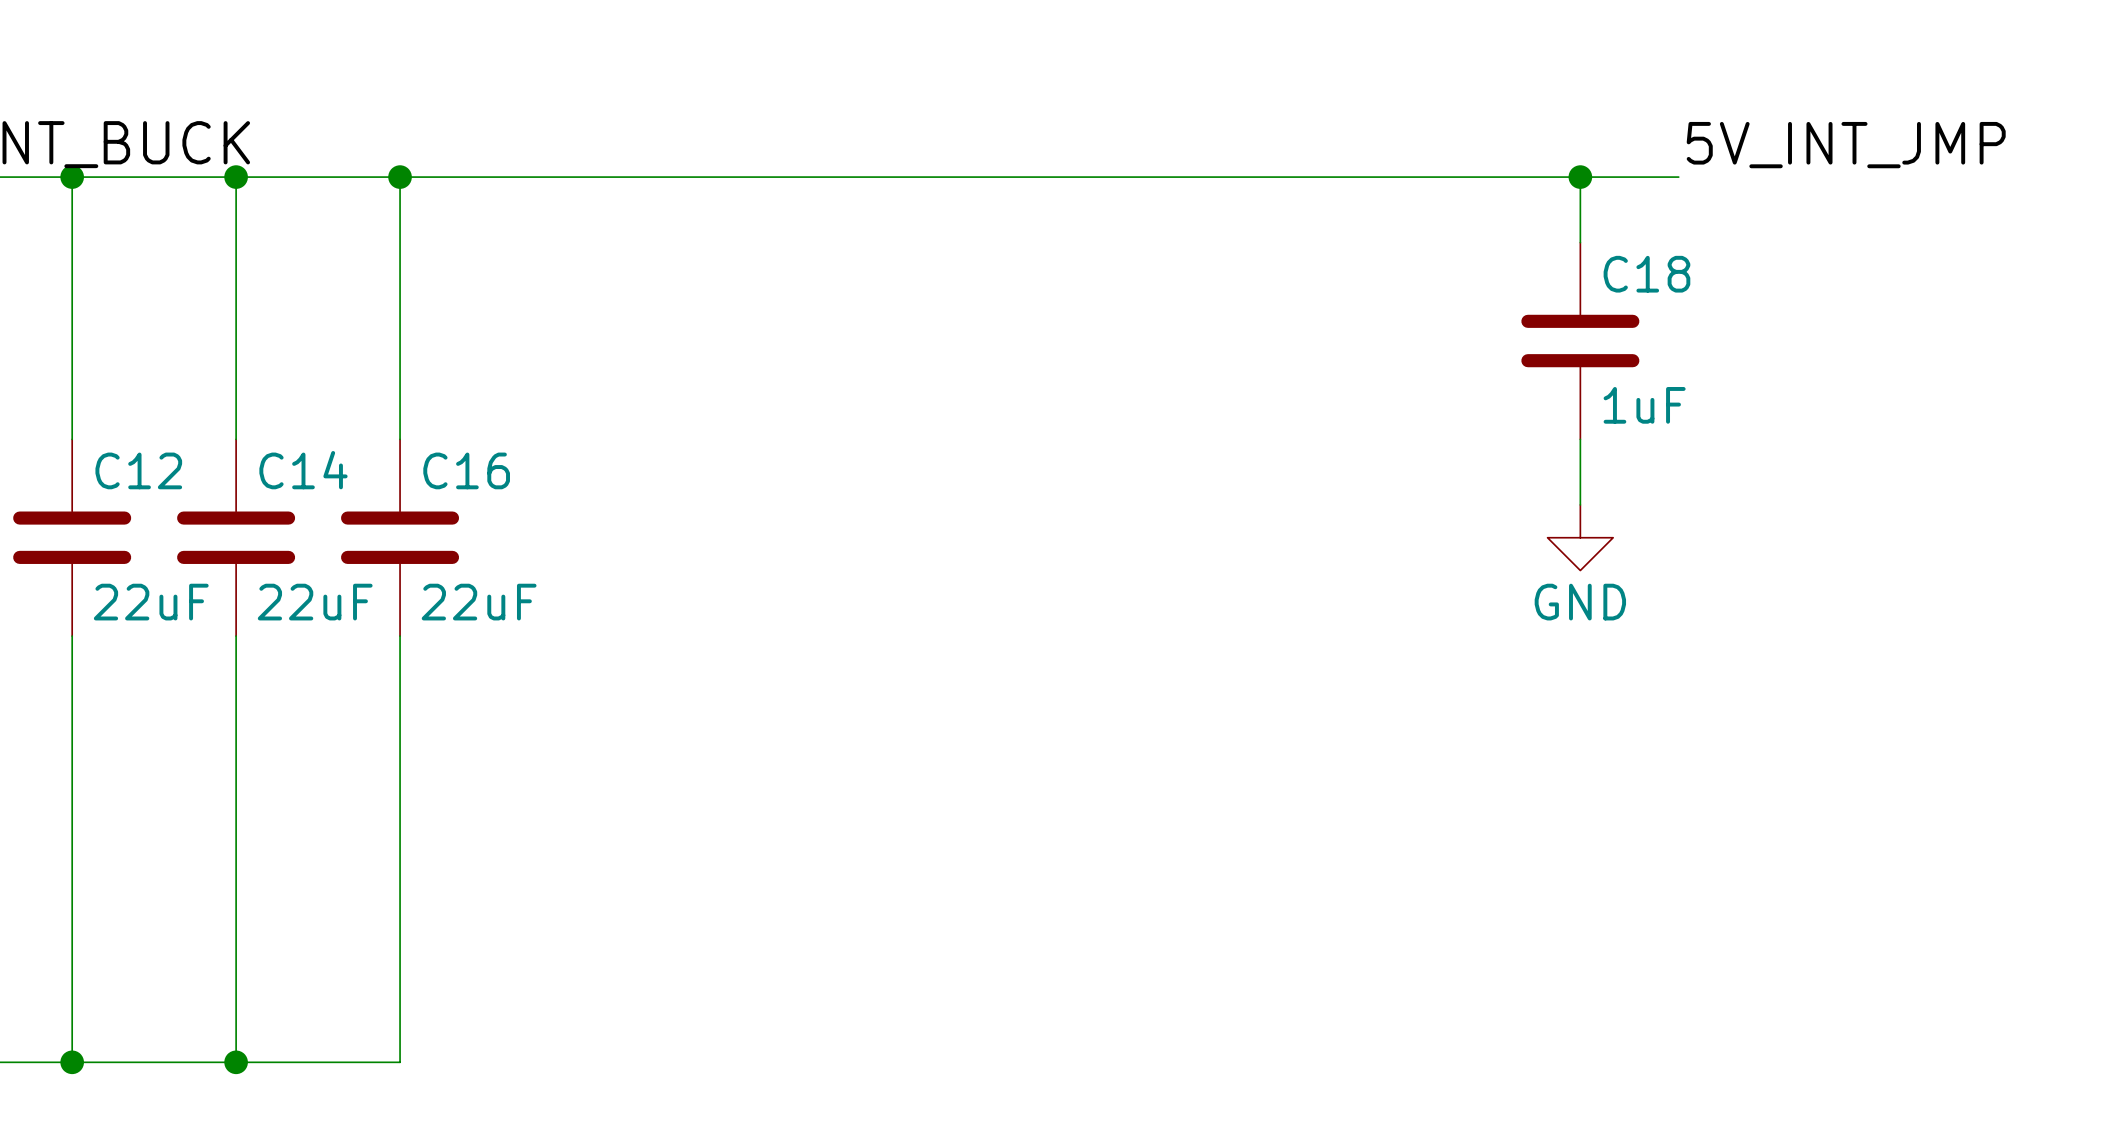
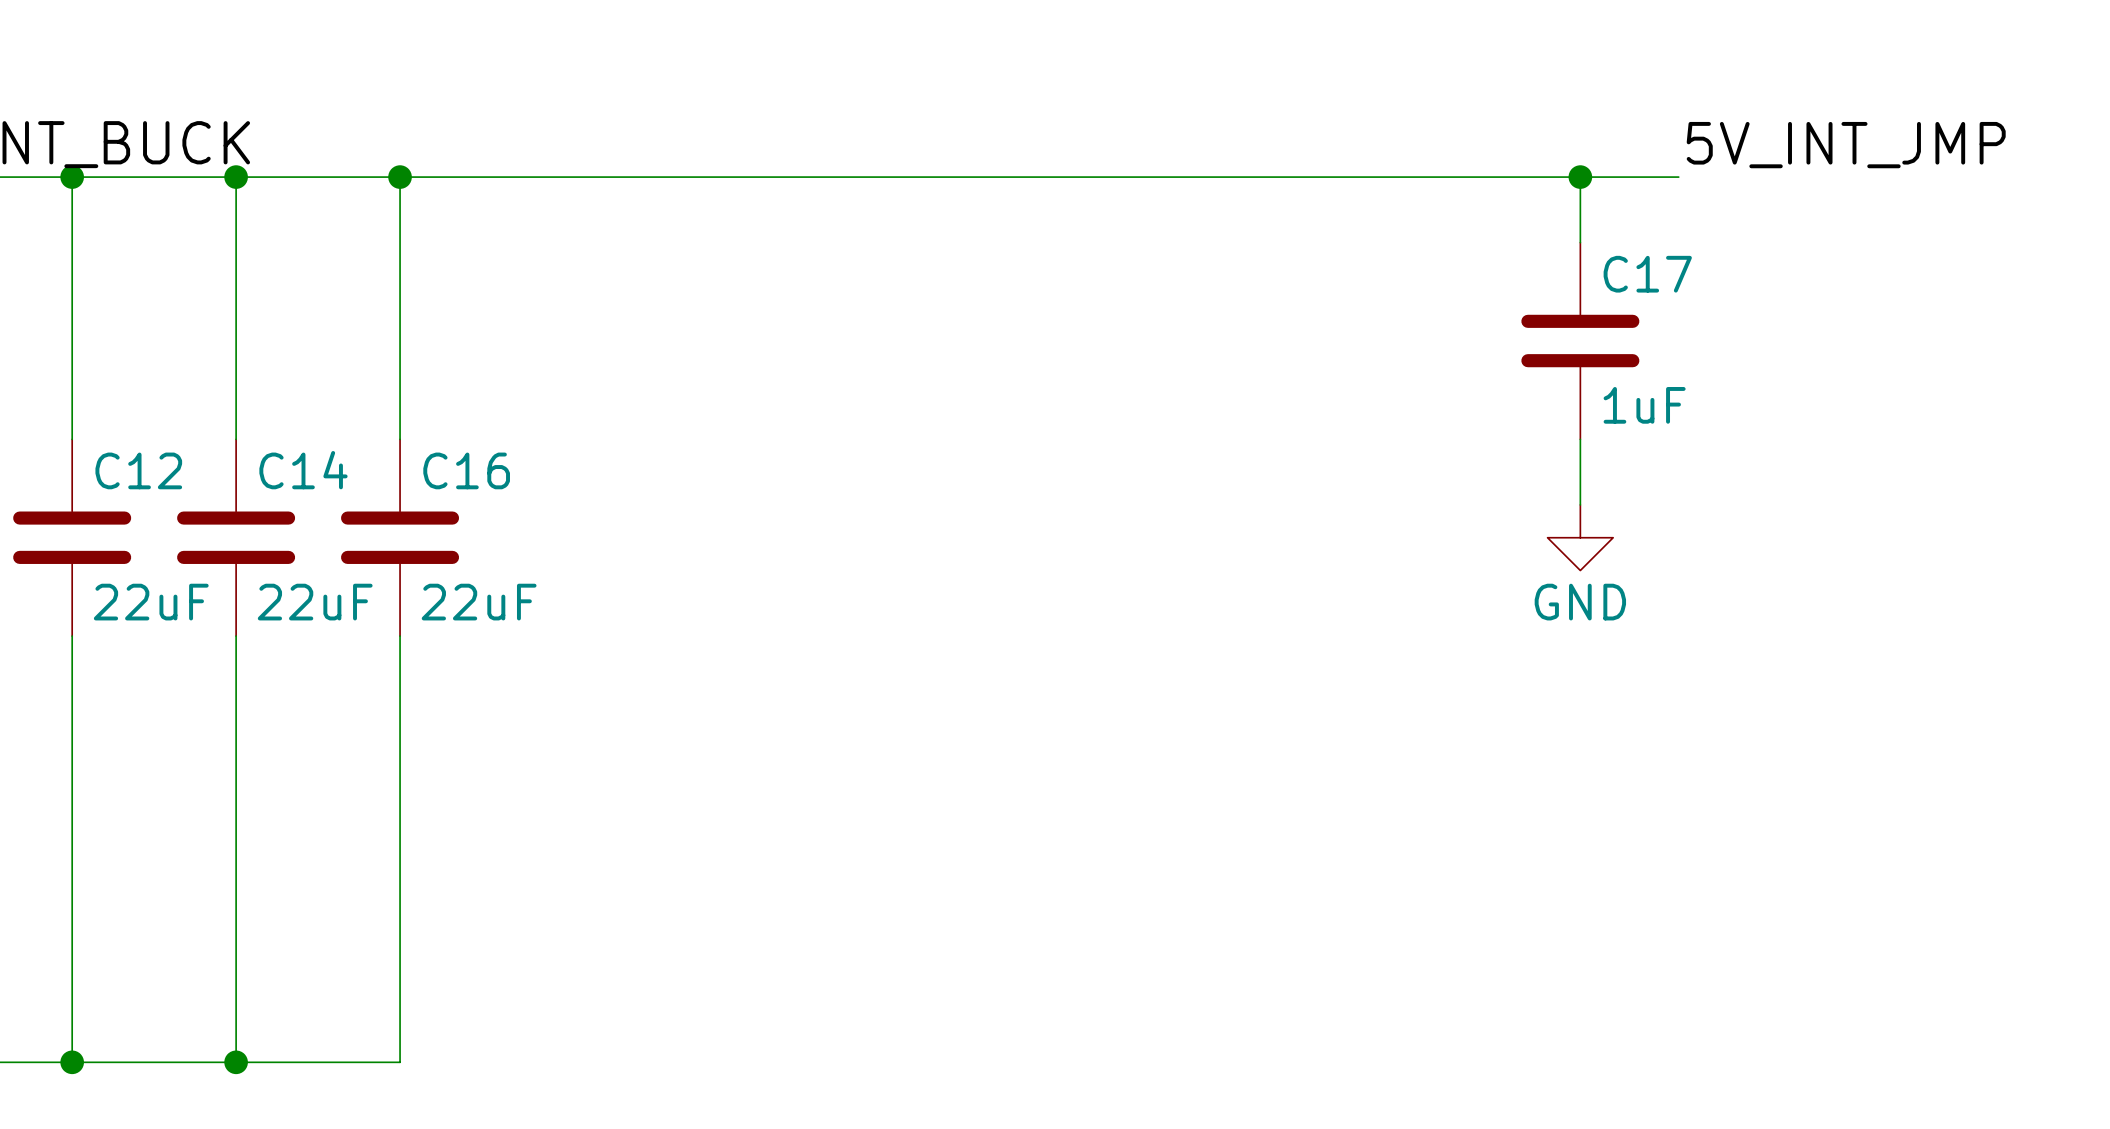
C18 name: C18 (1646, 274) -> C17 (1647, 274)

